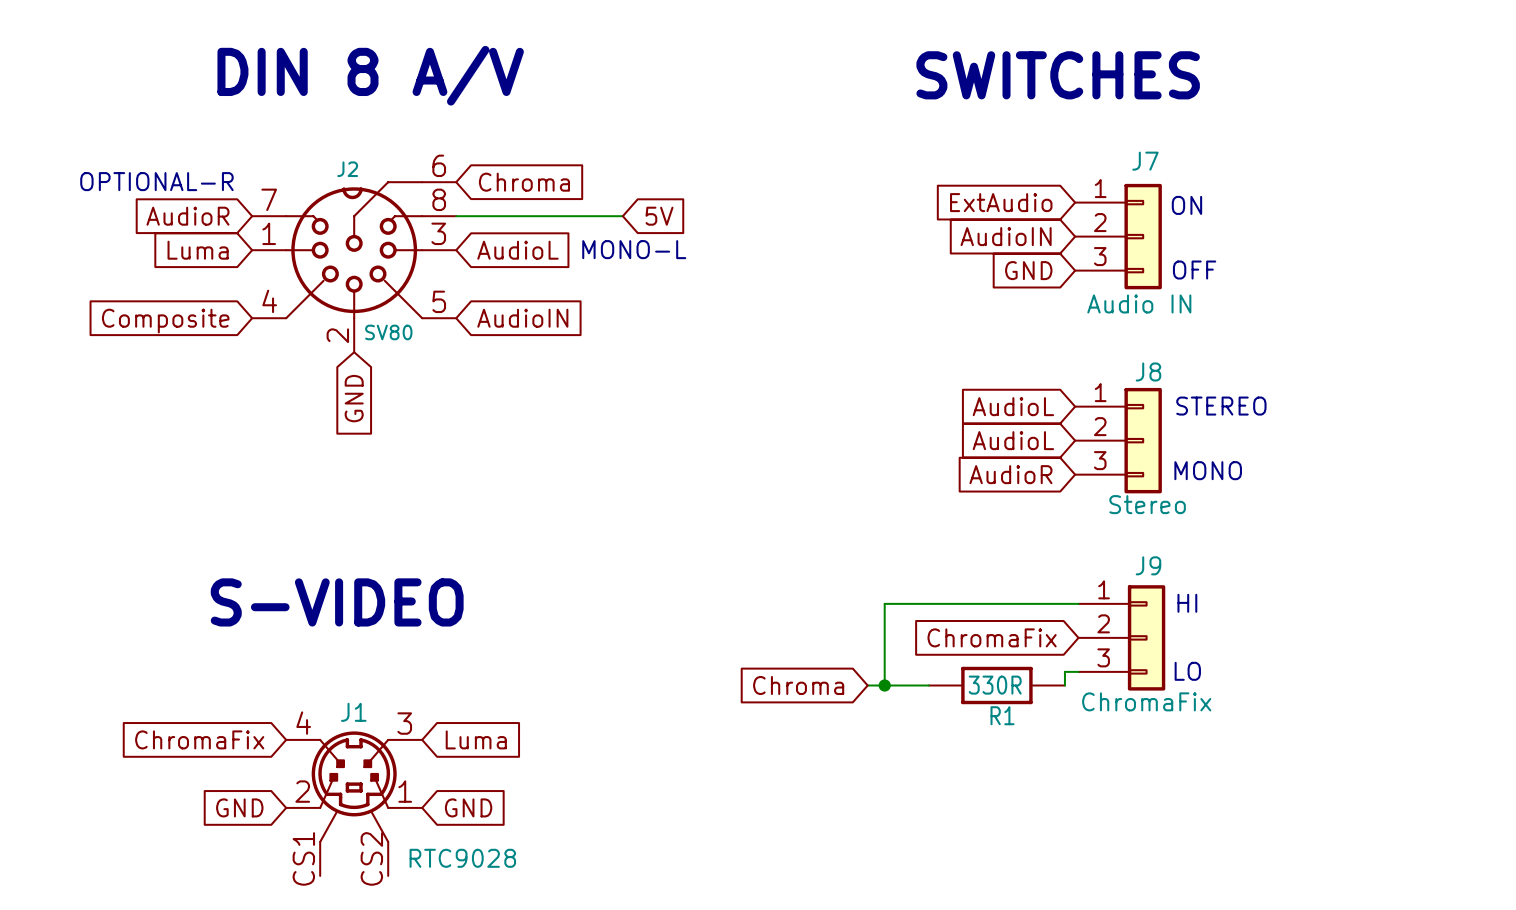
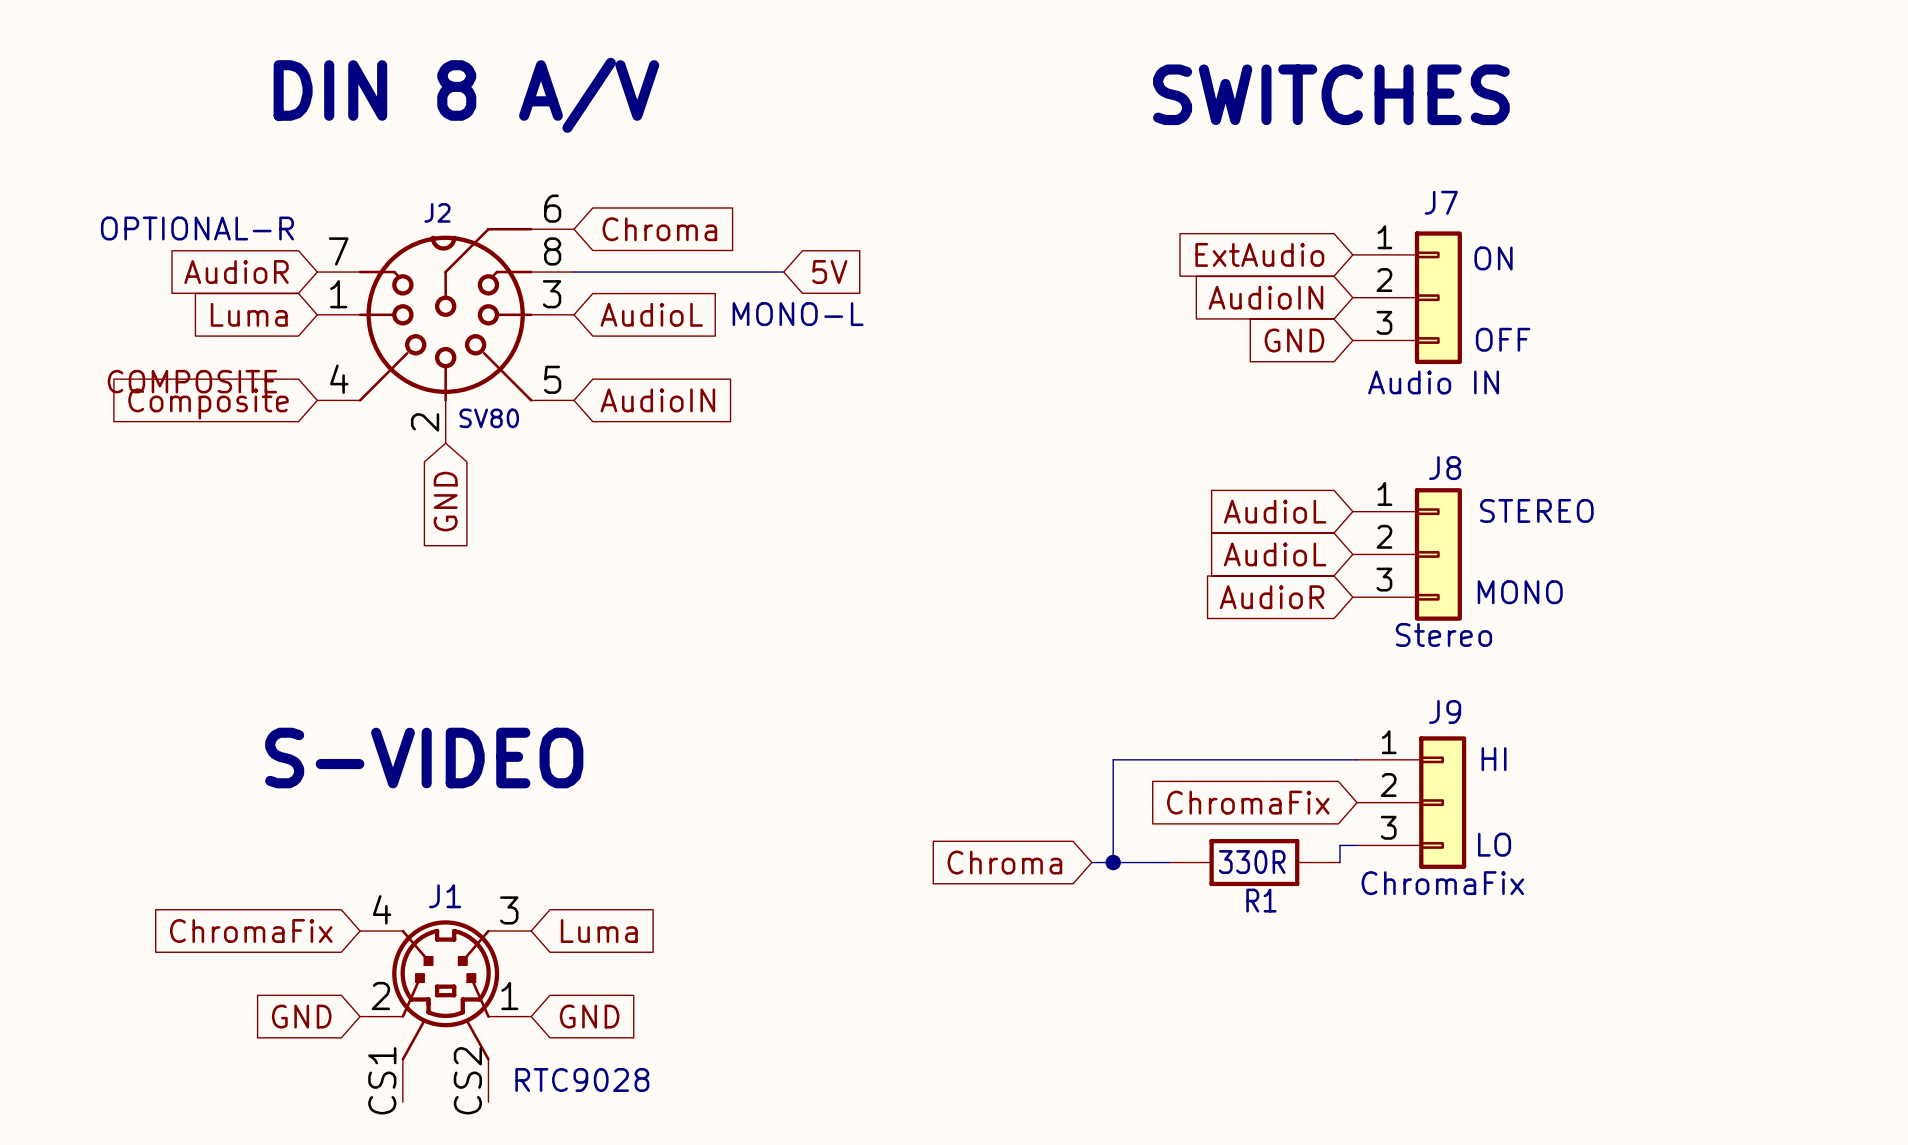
label: none -> COMPOSITE (192, 381)

